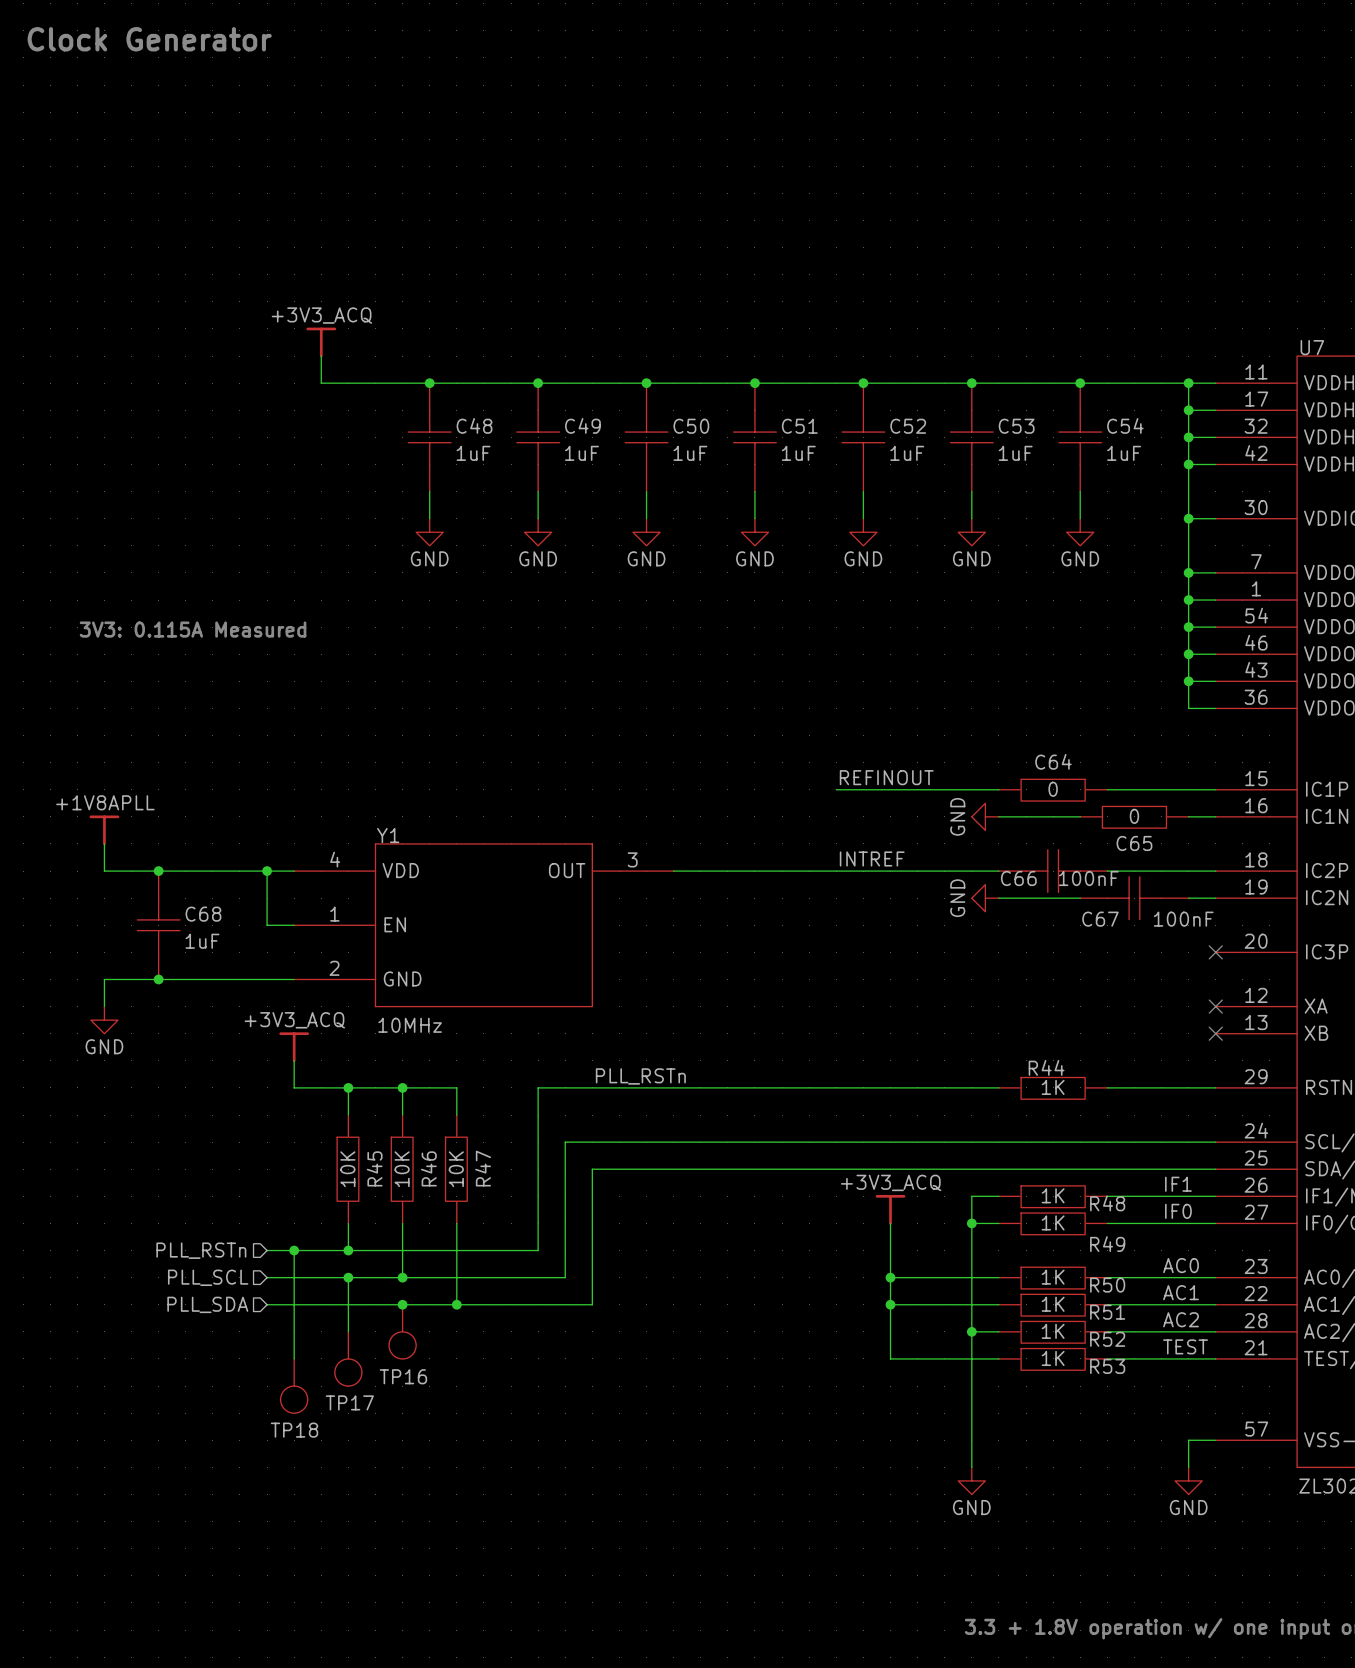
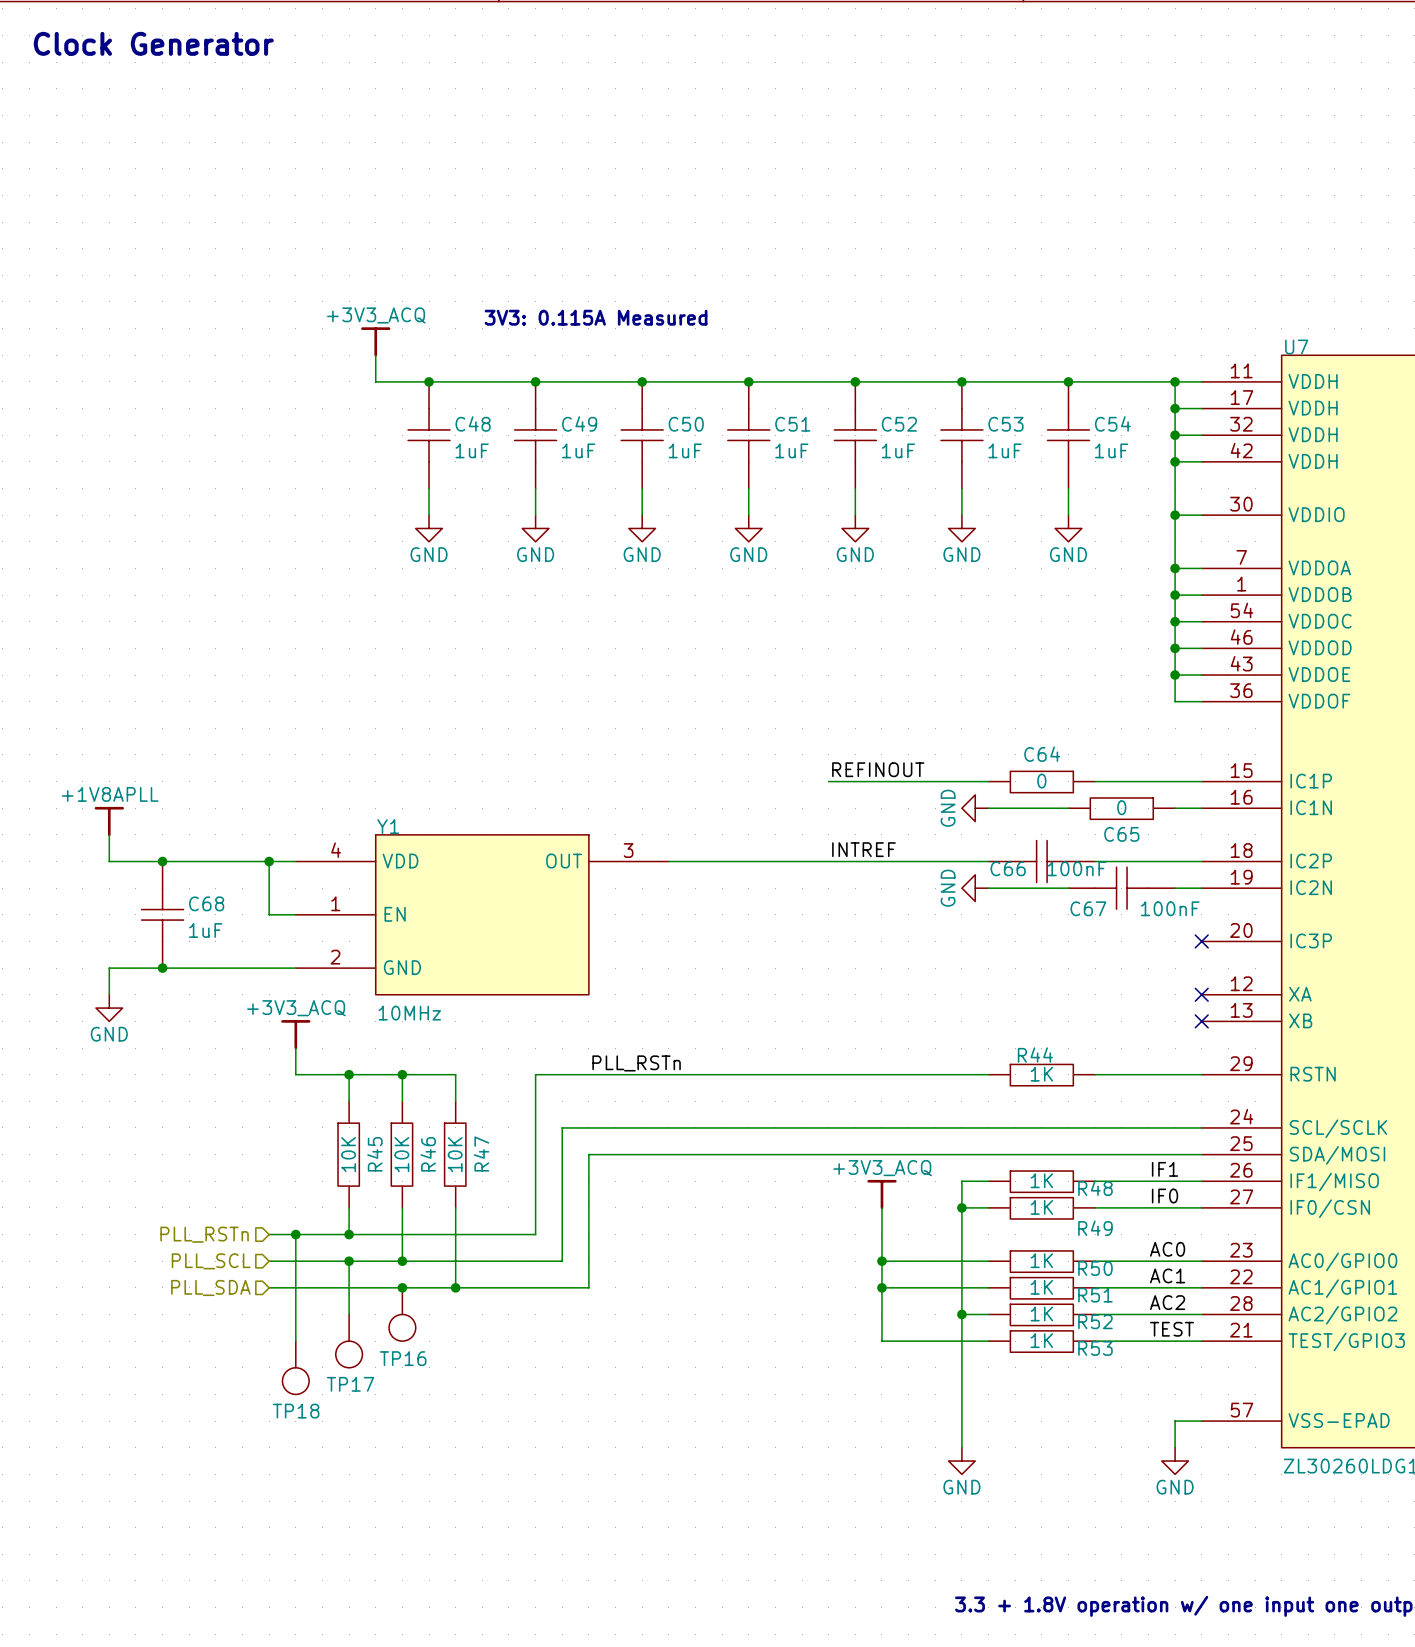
text: none -> 3V3: 0.115A Measured (596, 317)
power symbol position: +3V3_ACQ (321, 342) -> +3V3_ACQ (375, 341)
wire: (321, 356) (321, 383) (375, 383) -> (375, 355) (375, 381)
text: 3V3: 0.115A Measured (193, 629) -> none

